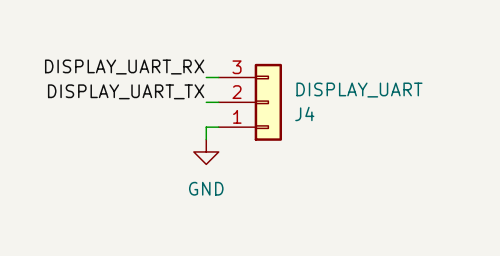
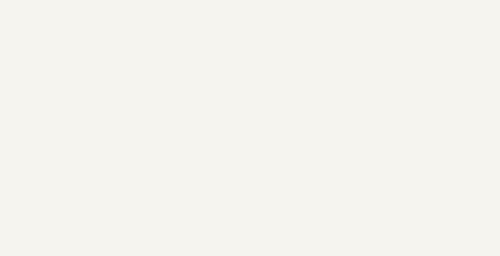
label: DISPLAY_UART_RX (124, 67) -> none
wire: (206, 77) (218, 77) -> none
label: DISPLAY_UART_TX (126, 91) -> none
wire: (206, 102) (218, 102) -> none
J4: DISPLAY_UART (250, 102) -> none
wire: (218, 127) (206, 127) (206, 139) -> none
power symbol: GND (206, 151) -> none

